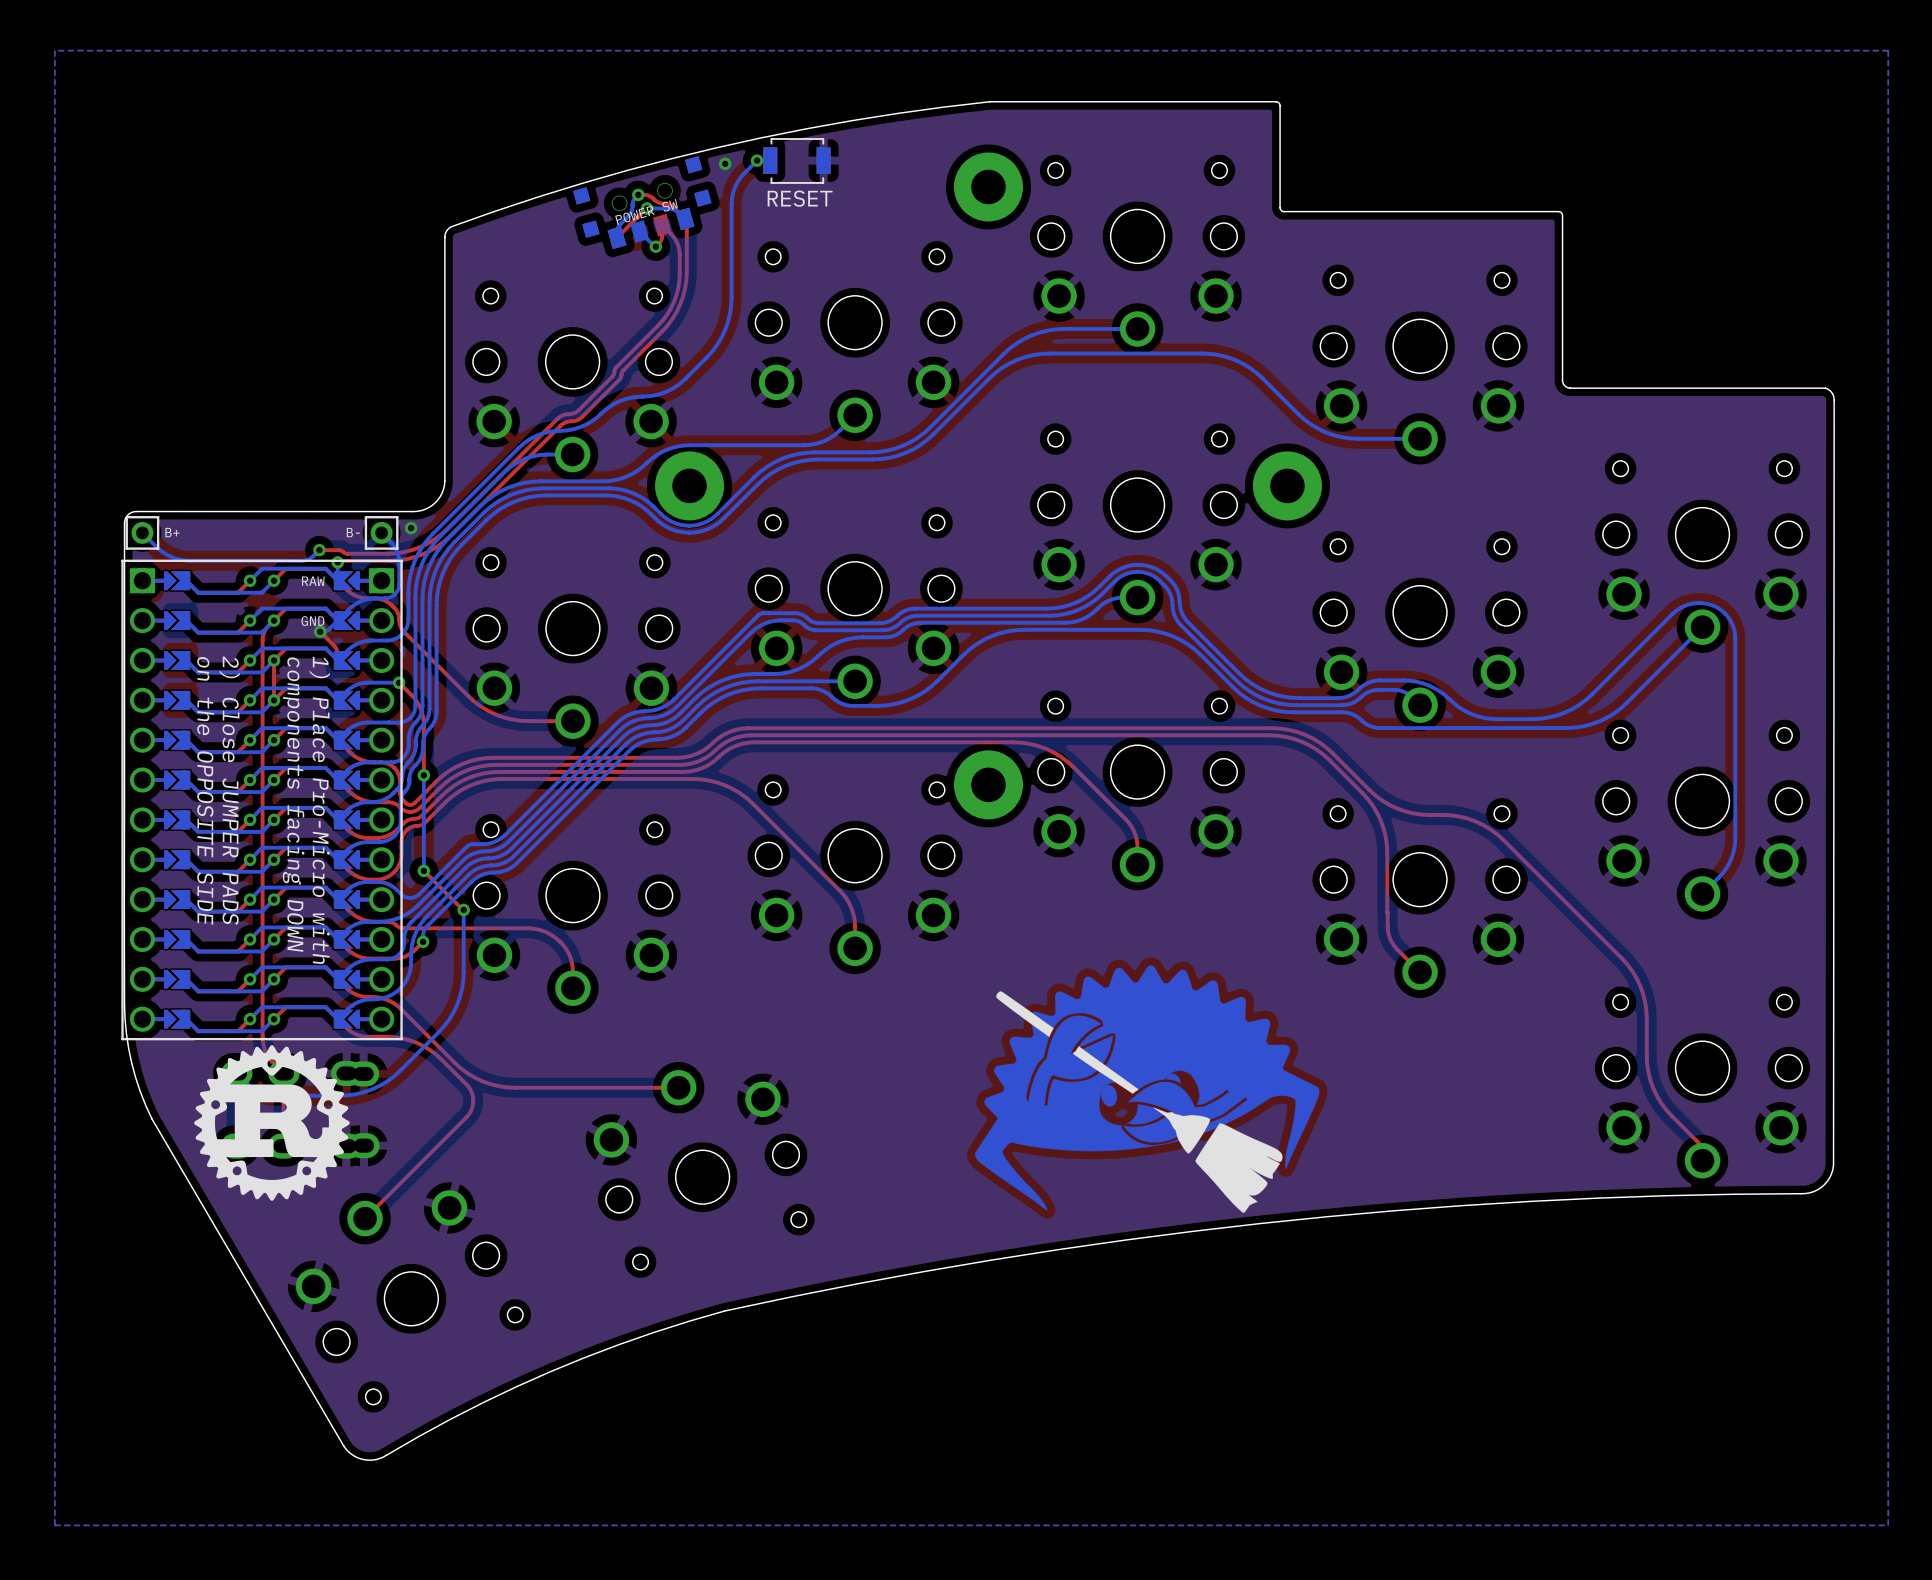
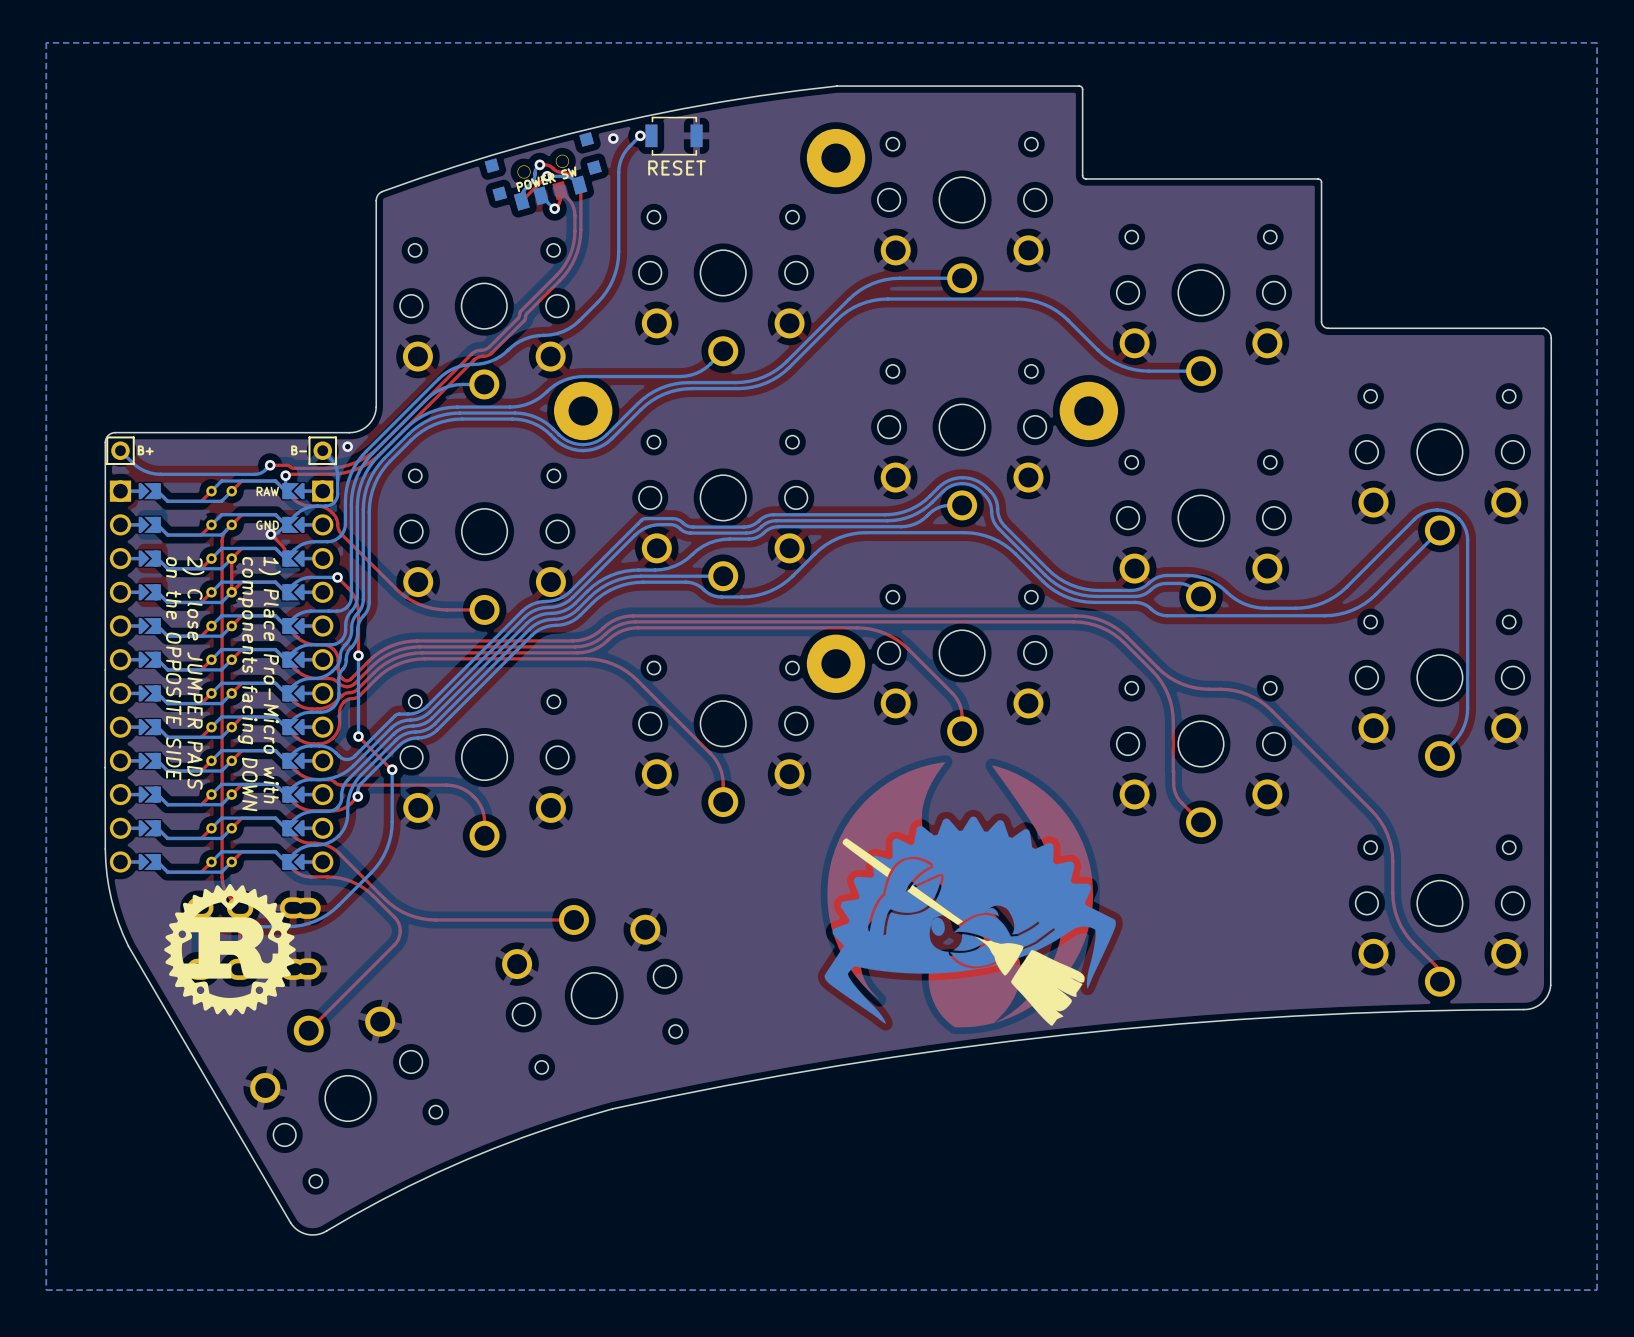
part footprint: [121, 559, 403, 1041] -> [109, 479, 334, 874]
drawing: none -> [827, 762, 1094, 1028]

